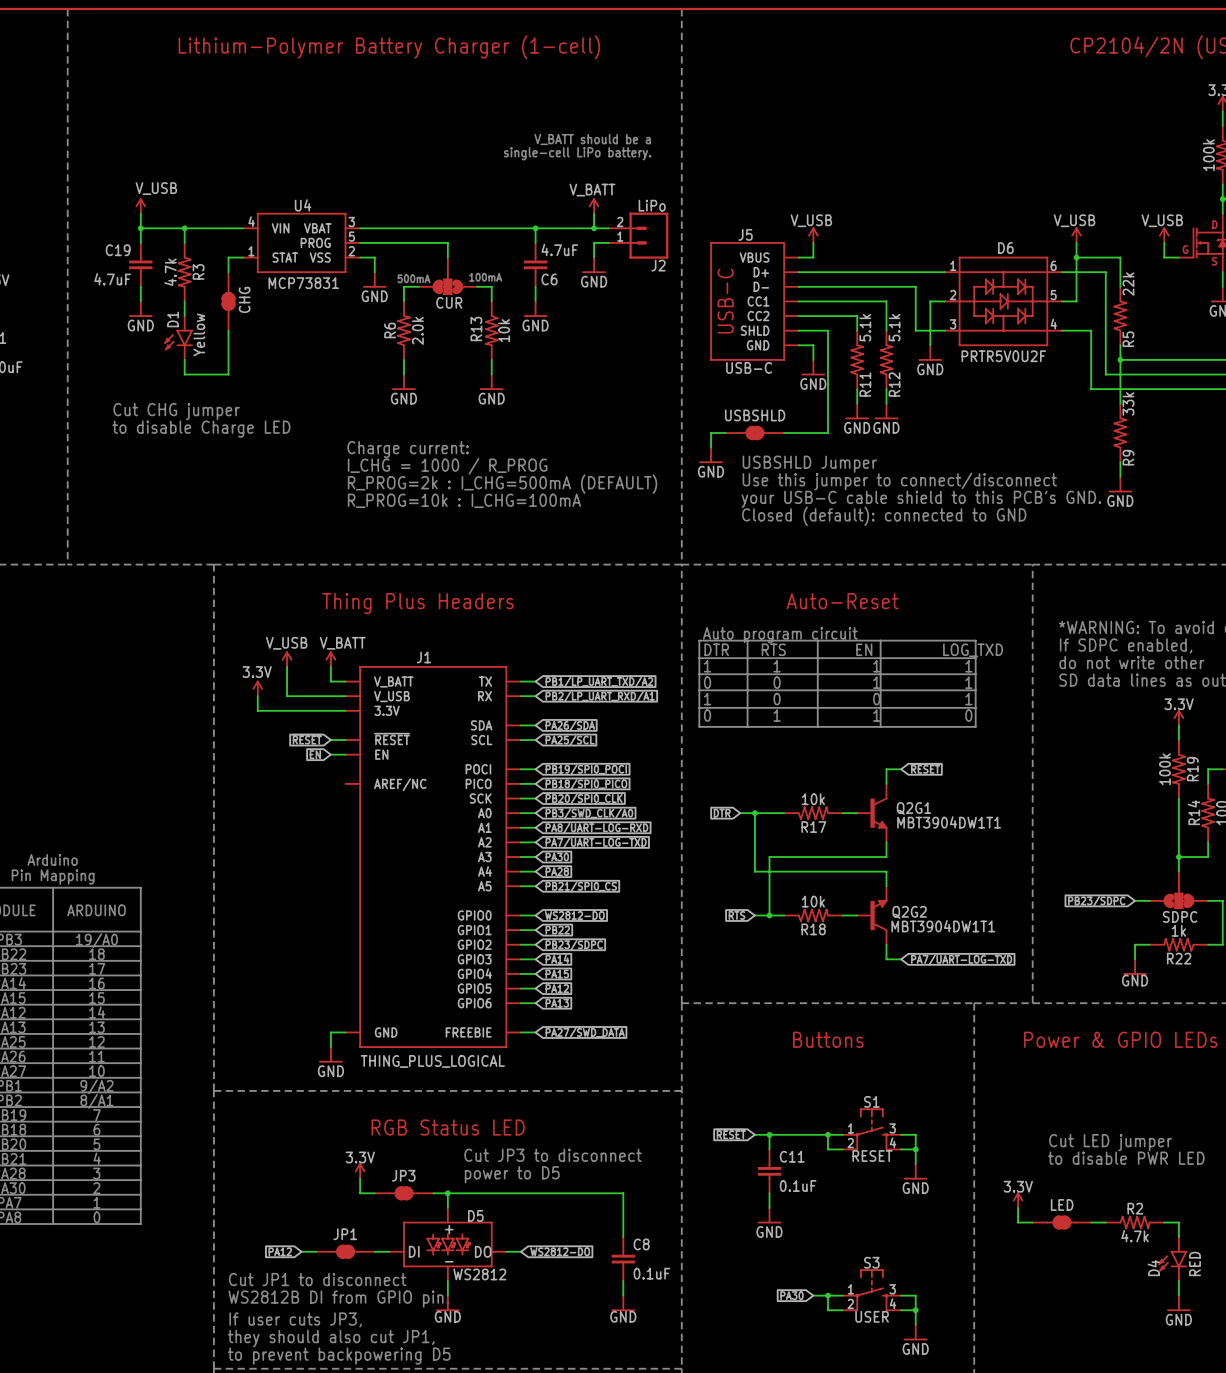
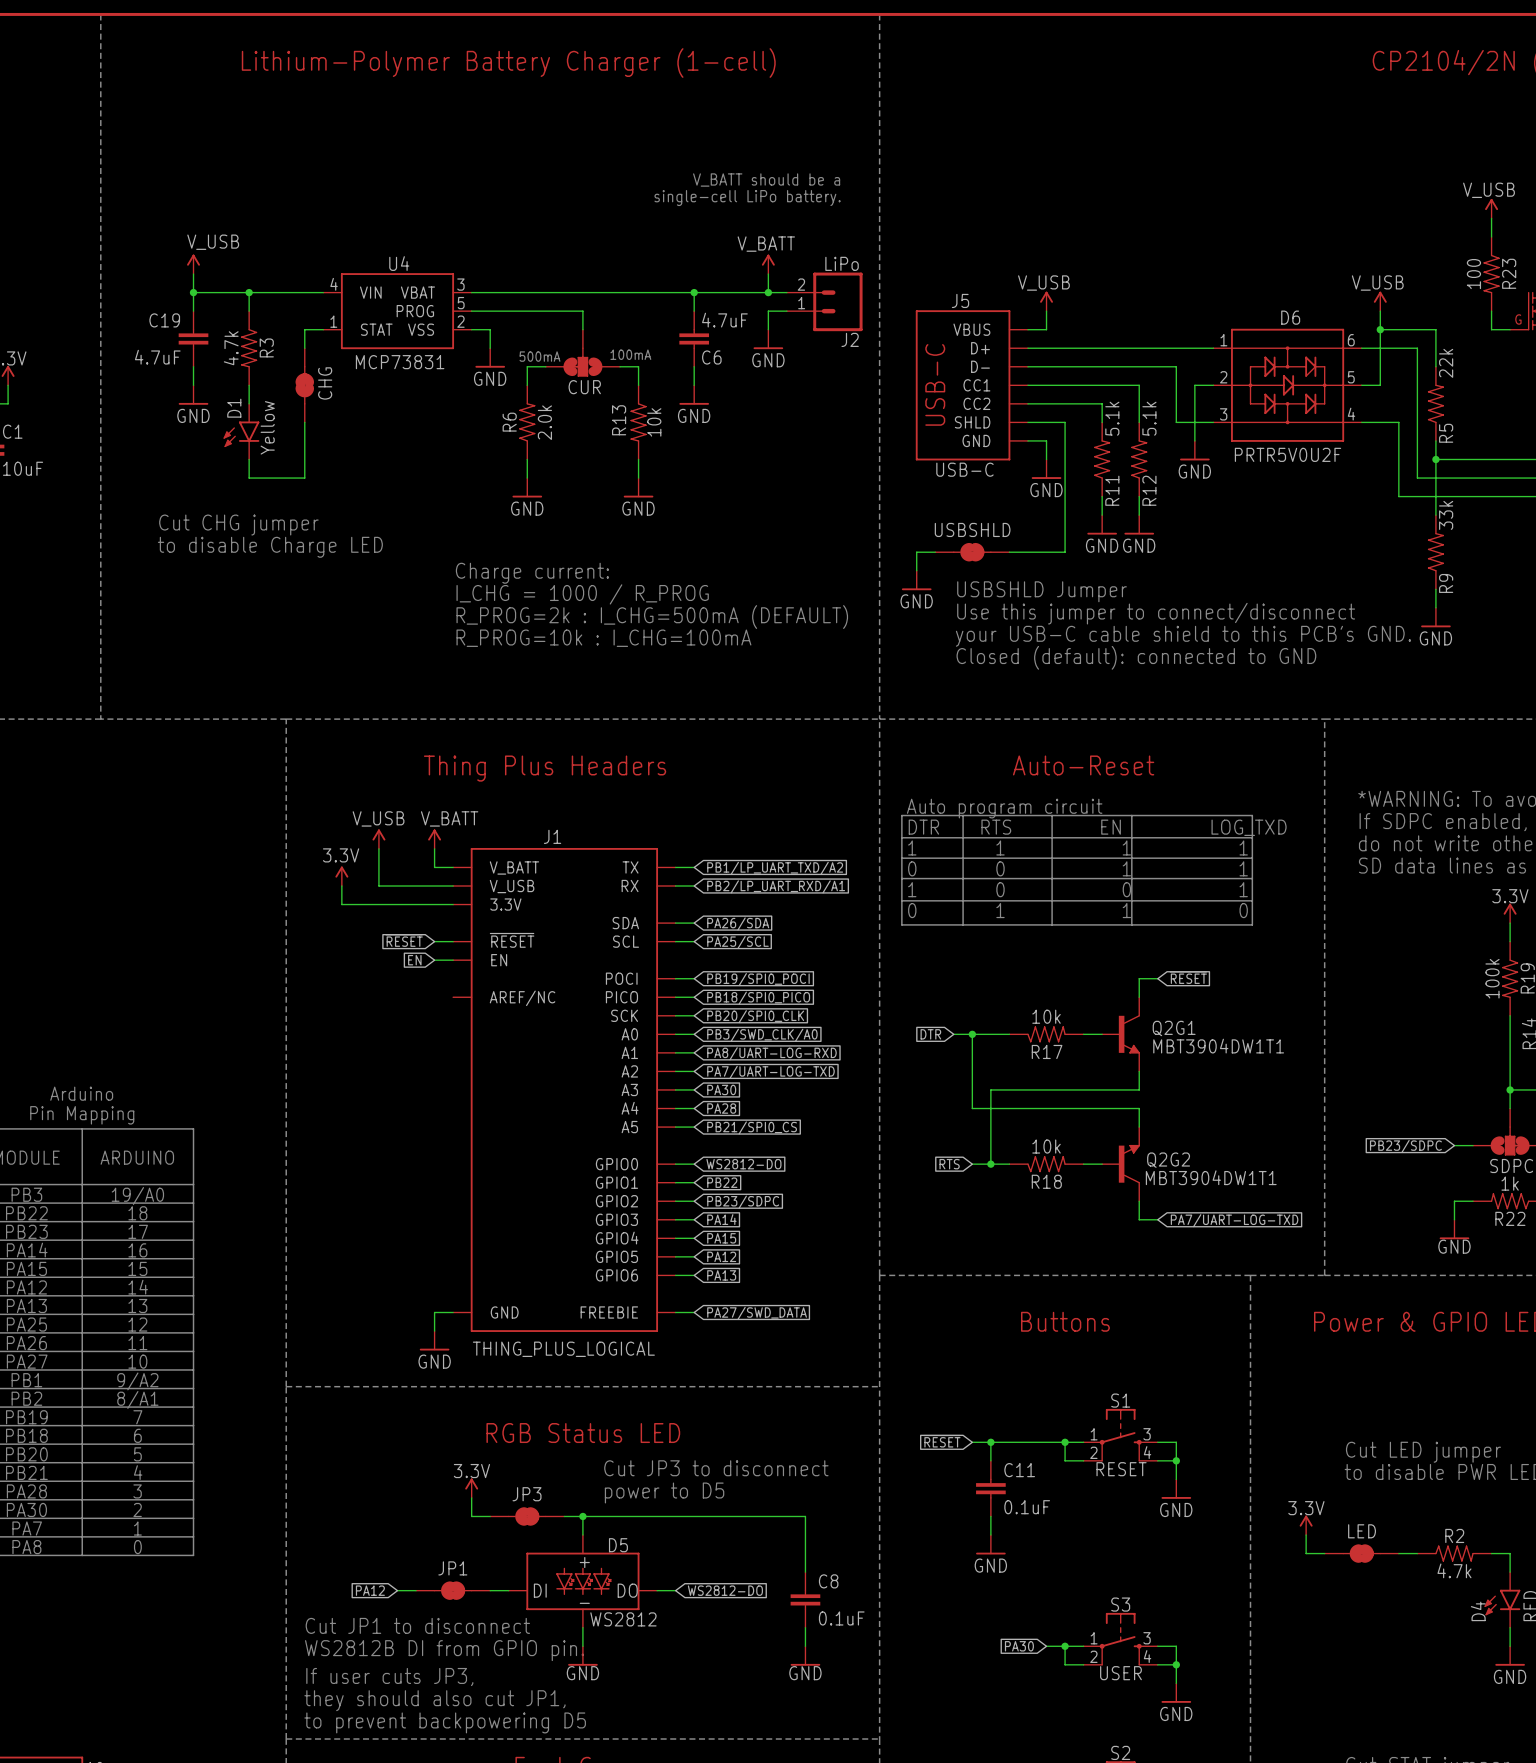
wire: none -> (1491, 218) (1491, 236)
R23: none -> 100 (1491, 274)
power symbol position: V_USB (1164, 235) -> V_USB (1491, 208)

